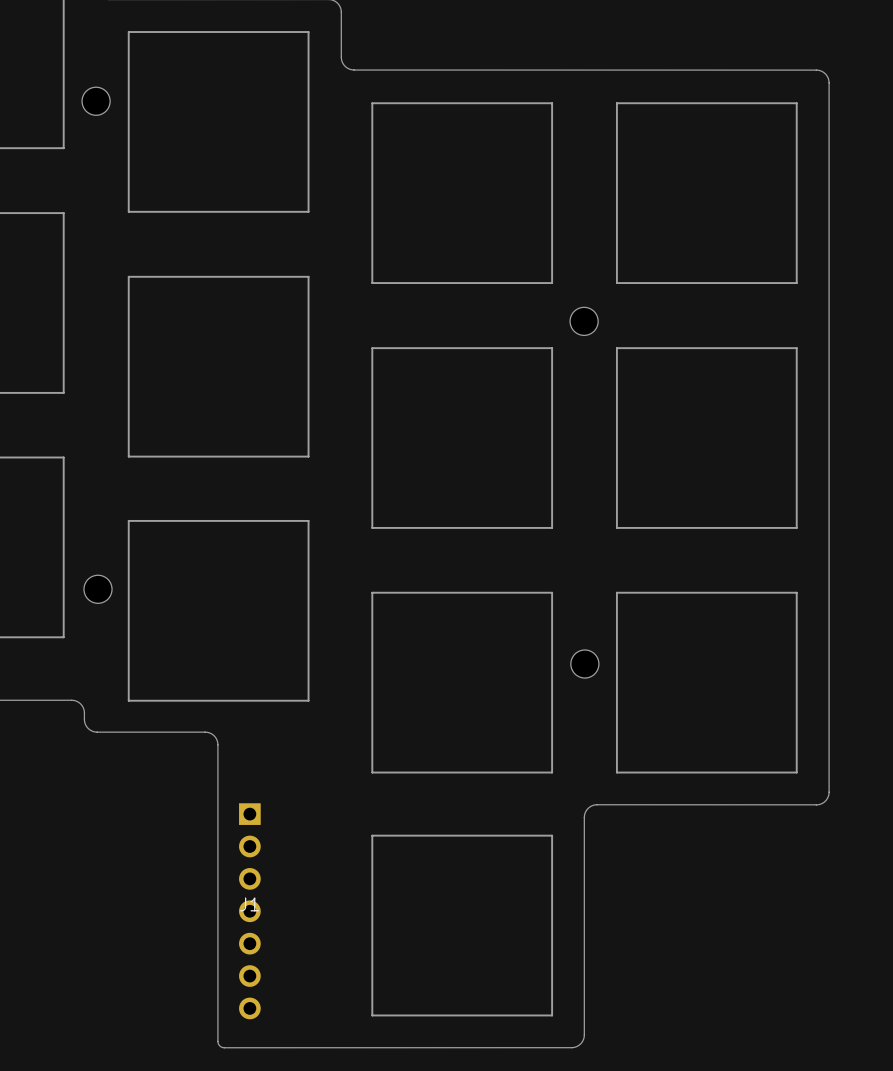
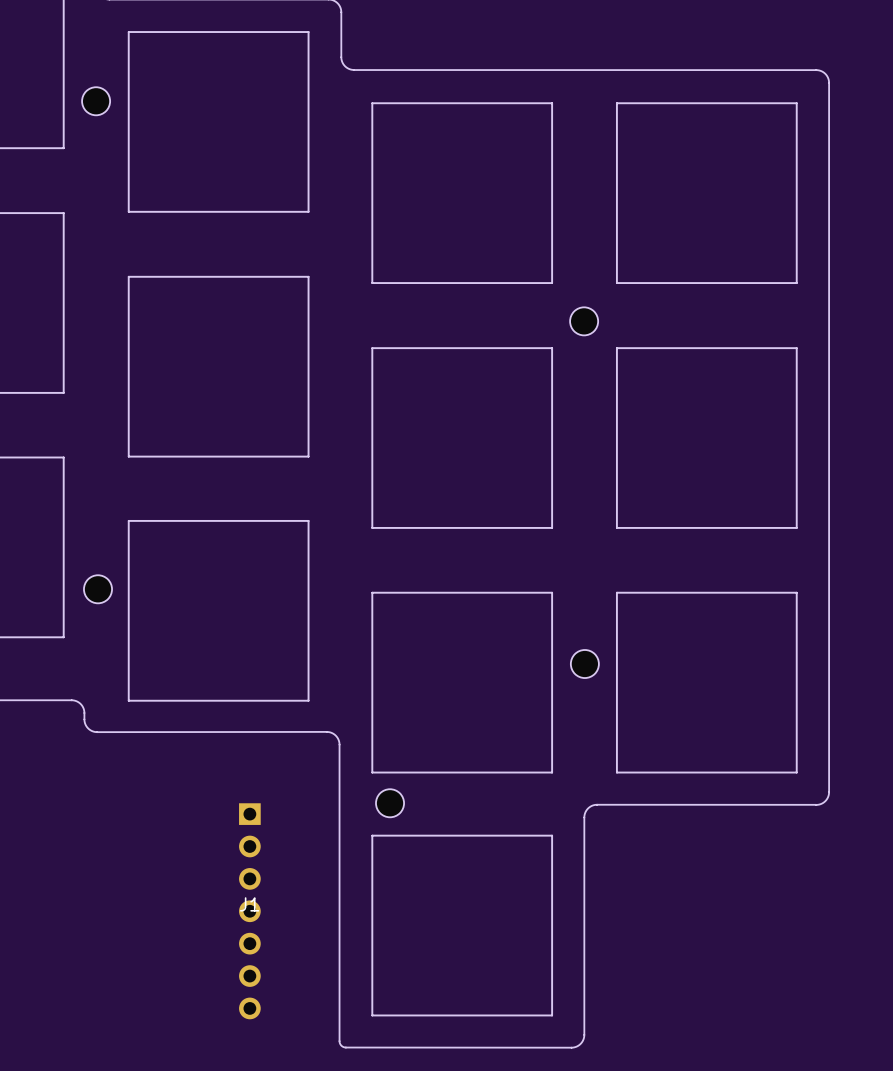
board edge: (97, 732) (206, 732) (213, 734) (217, 740) (217, 1041) (221, 1046) (571, 1047) -> (97, 732) (326, 731) (333, 733) (338, 739) (339, 744) (340, 1045) (345, 1047) (571, 1047)
part: none -> (390, 803)

